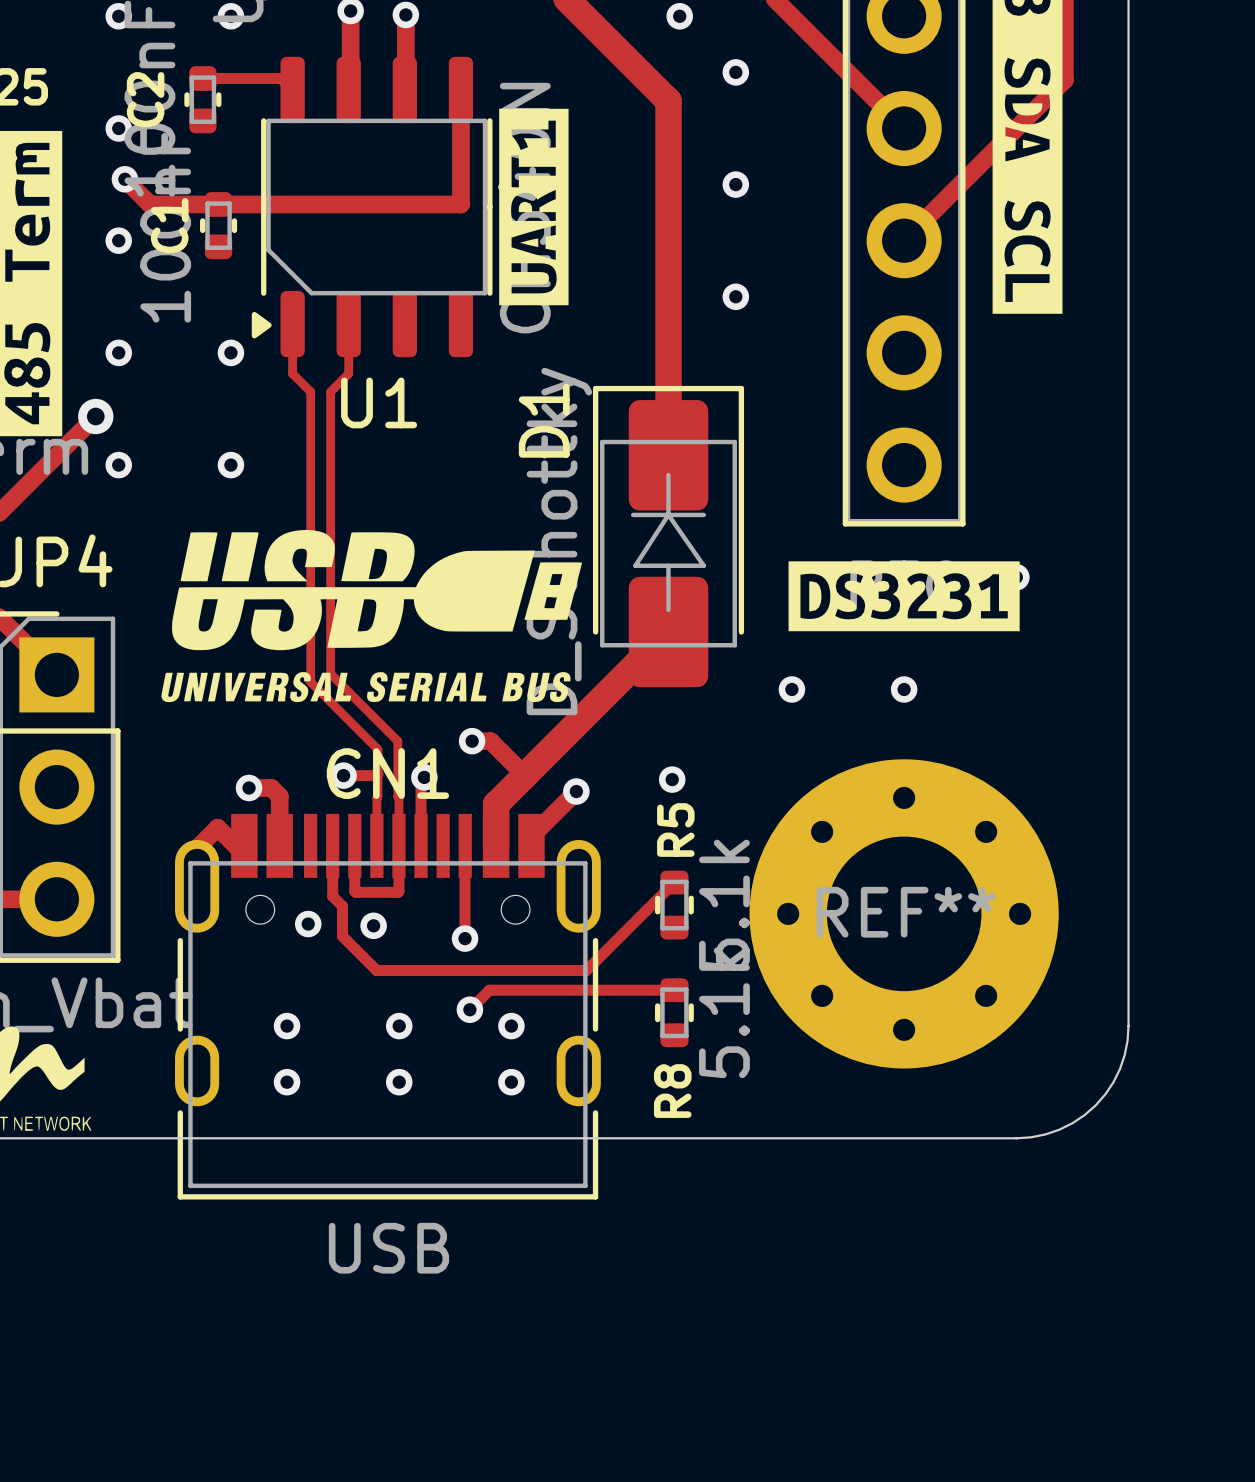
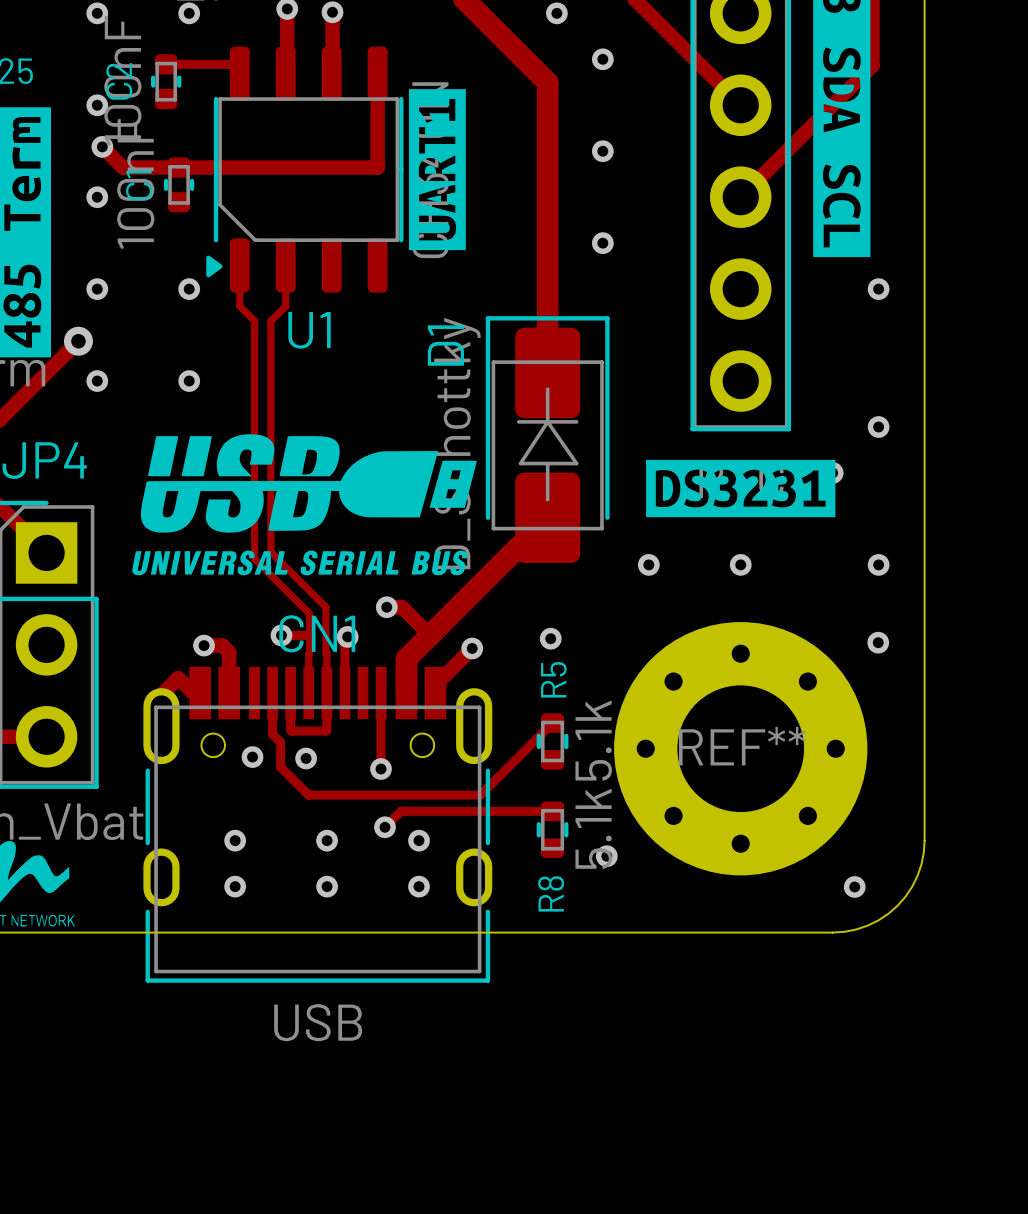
via: none -> (878, 289)
via: none -> (878, 427)
via: none -> (878, 564)
via: none -> (878, 642)
via: none -> (606, 856)
via: none -> (854, 886)

